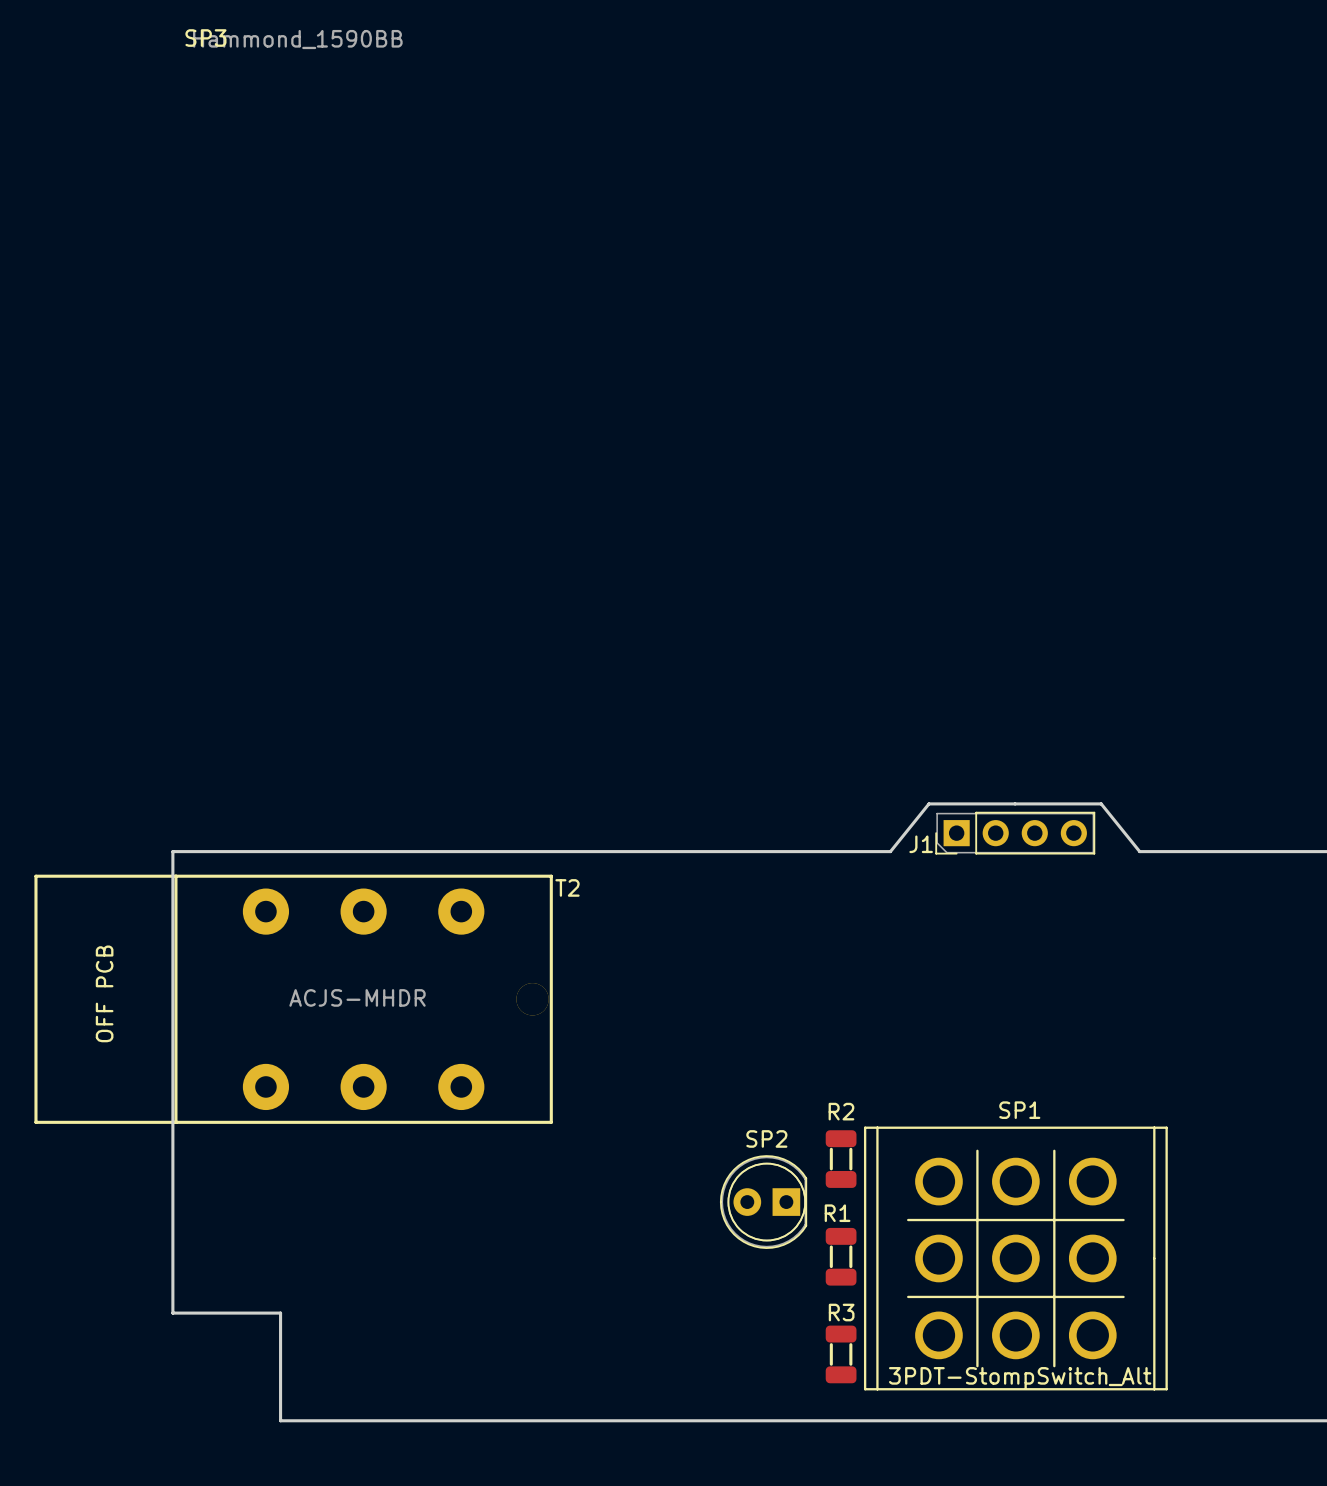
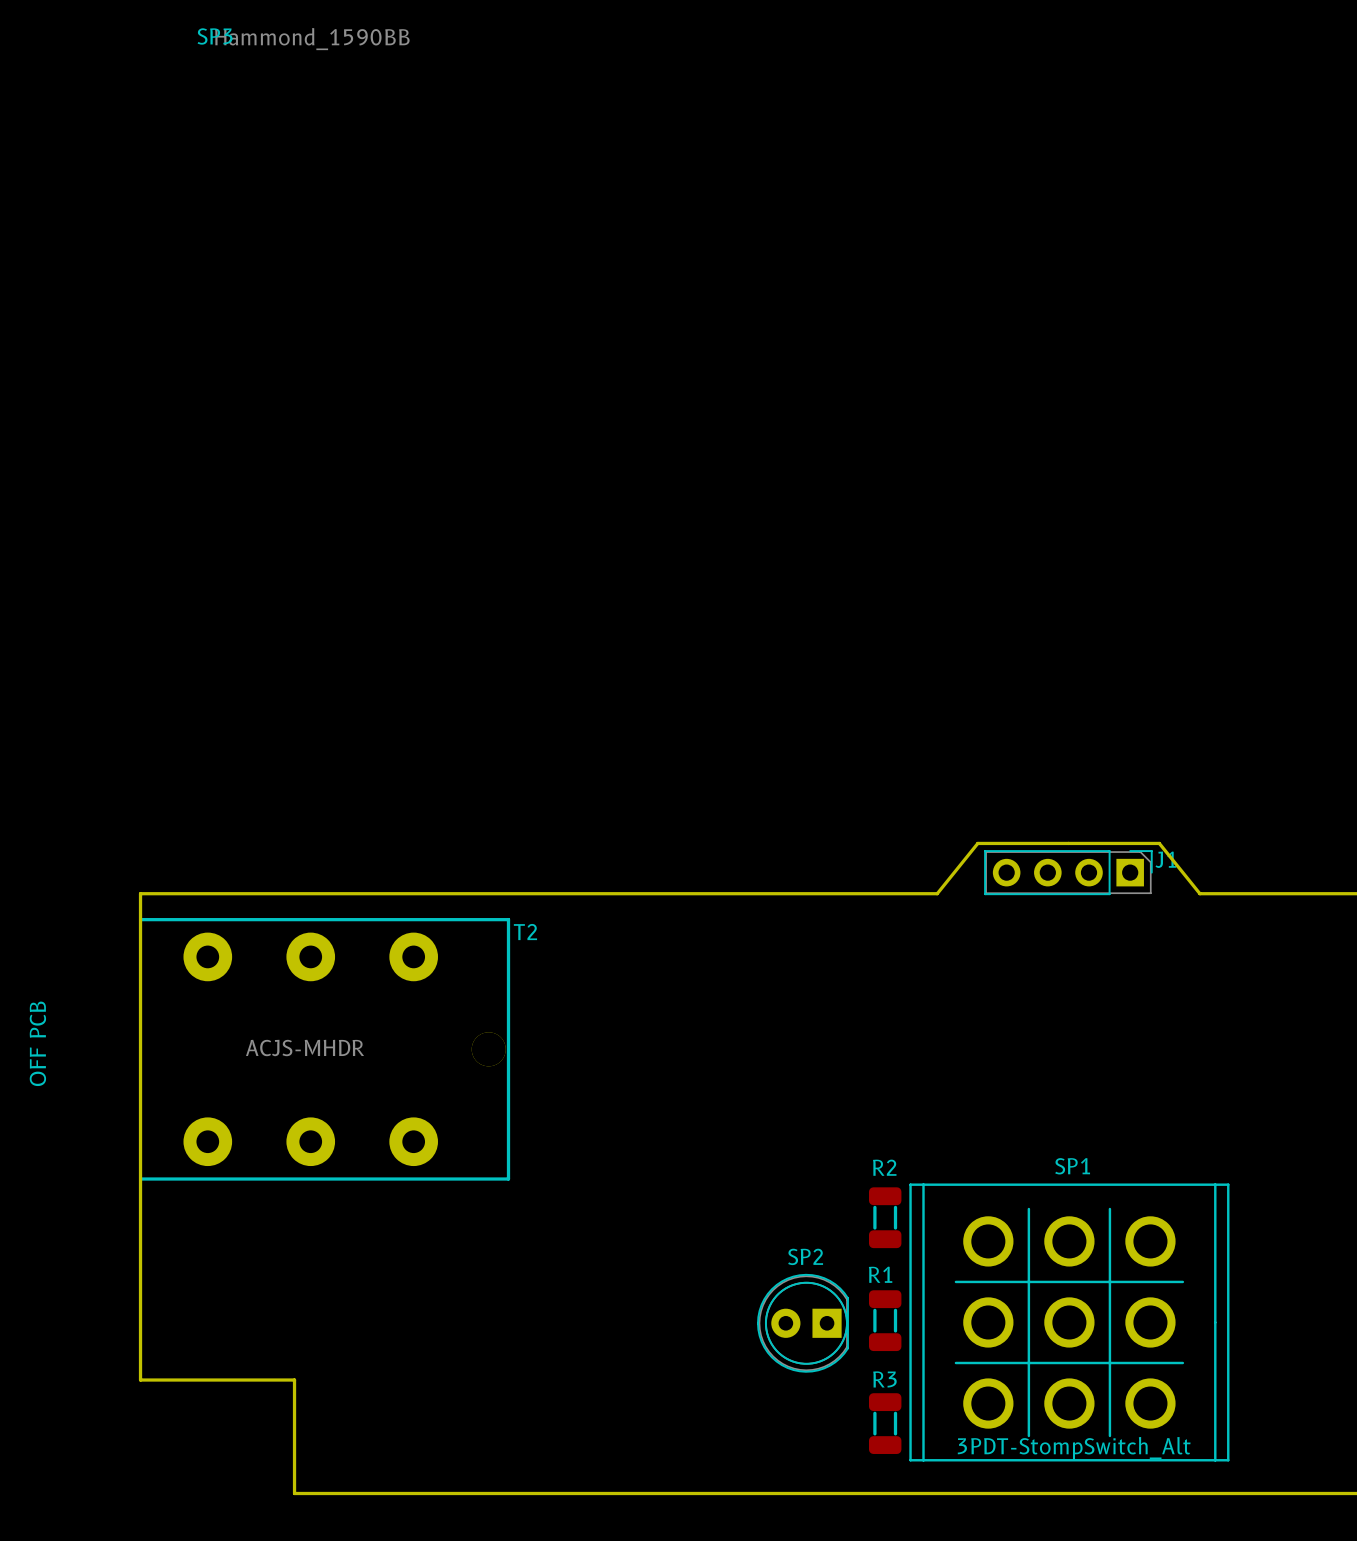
J1 rotation: 0° (1015, 833) -> 180° (1068, 872)
board edge: (172, 851) (172, 1313) -> (181, 893) (140, 893) (140, 1380) (181, 1380)
T2 footprint: [34, 874, 553, 1124] -> [138, 918, 511, 1181]
T2 name position: T2 (567, 887) -> T2 (525, 932)
T2 value position: ACJS-MHDR (357, 997) -> ACJS-MHDR (305, 1048)
SP2 position: (763, 1202) -> (802, 1323)

